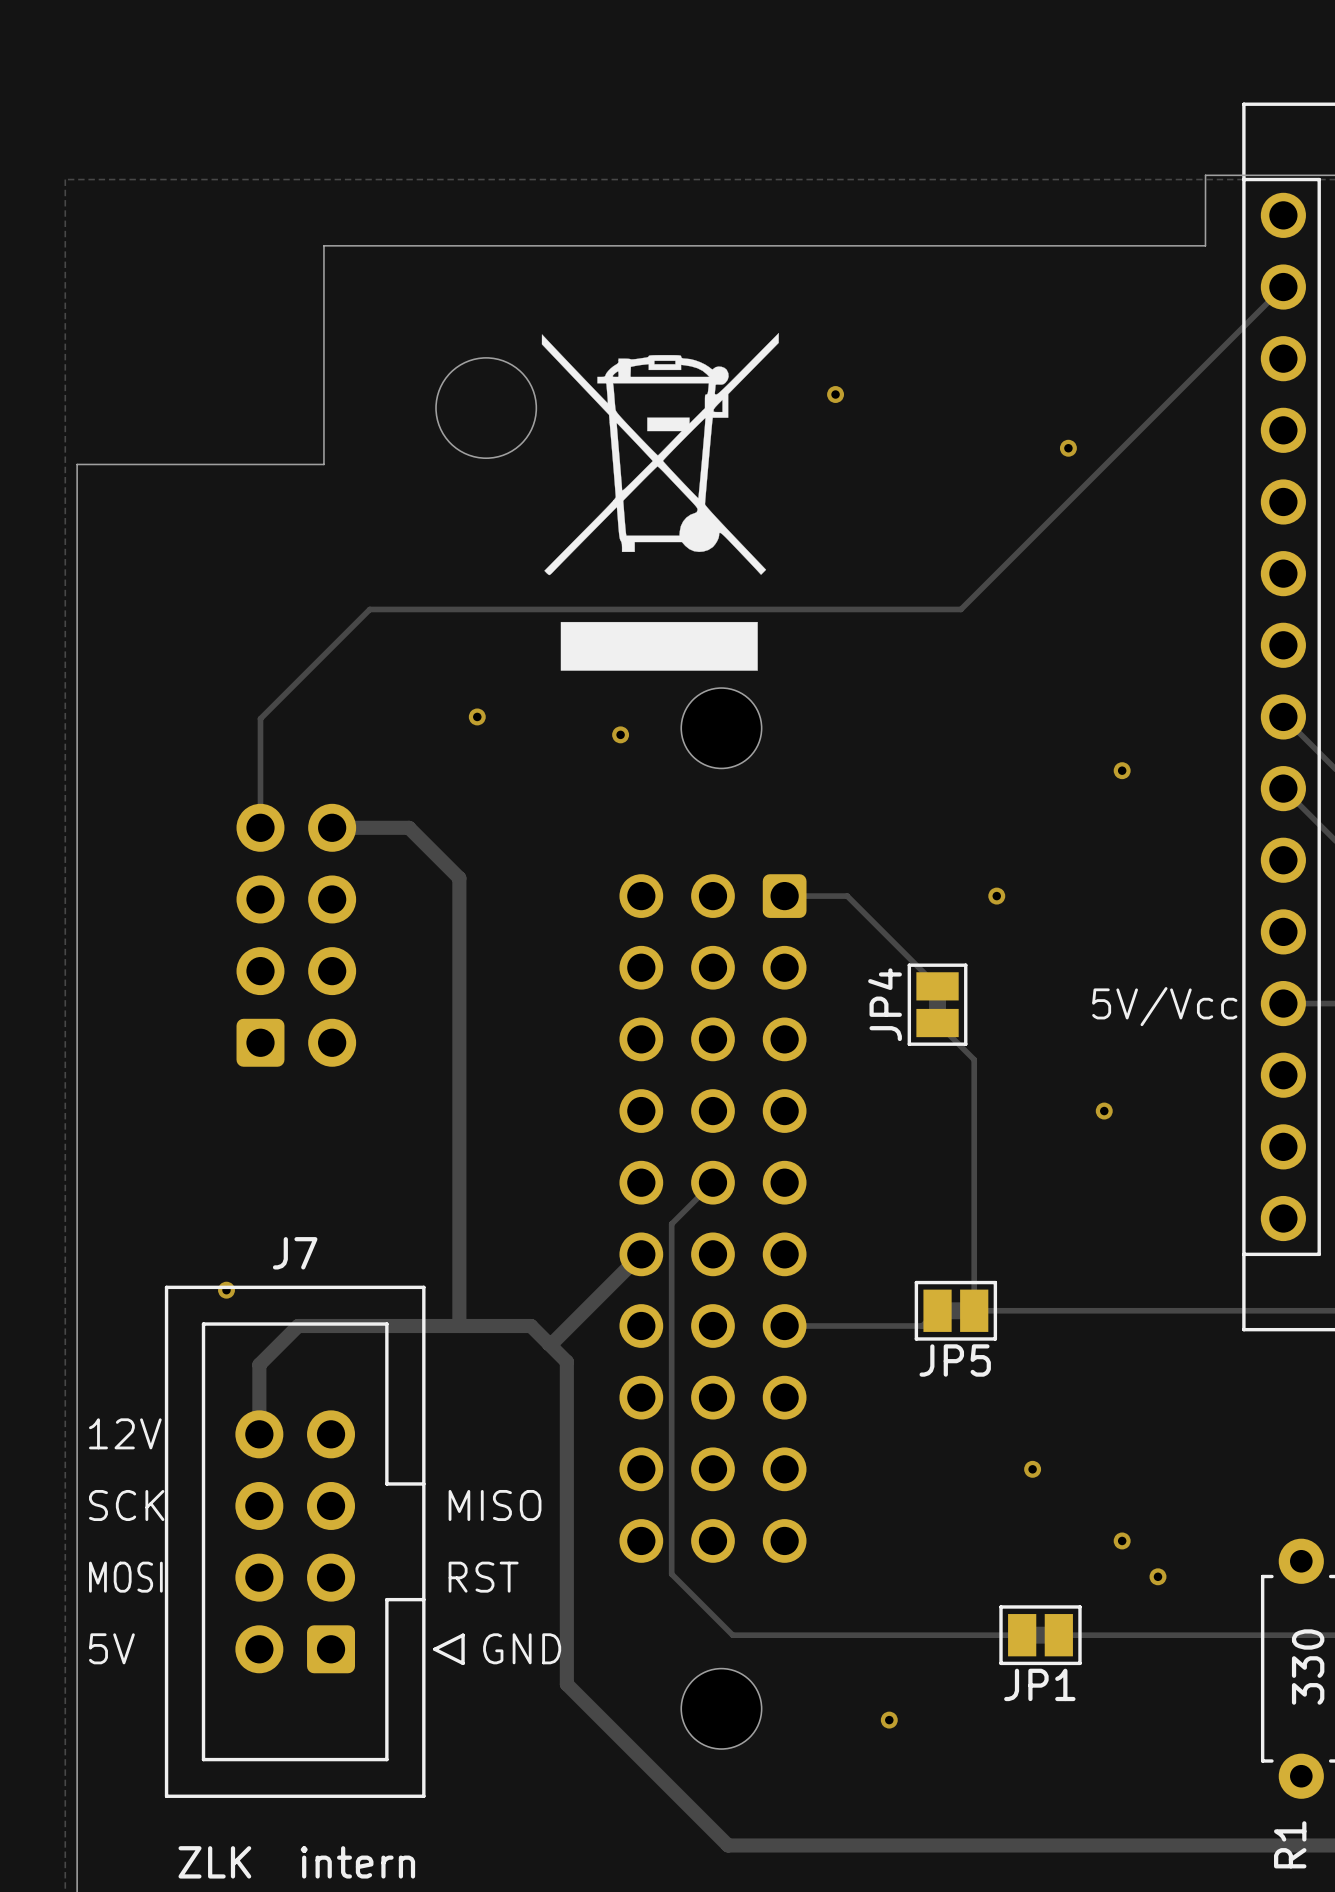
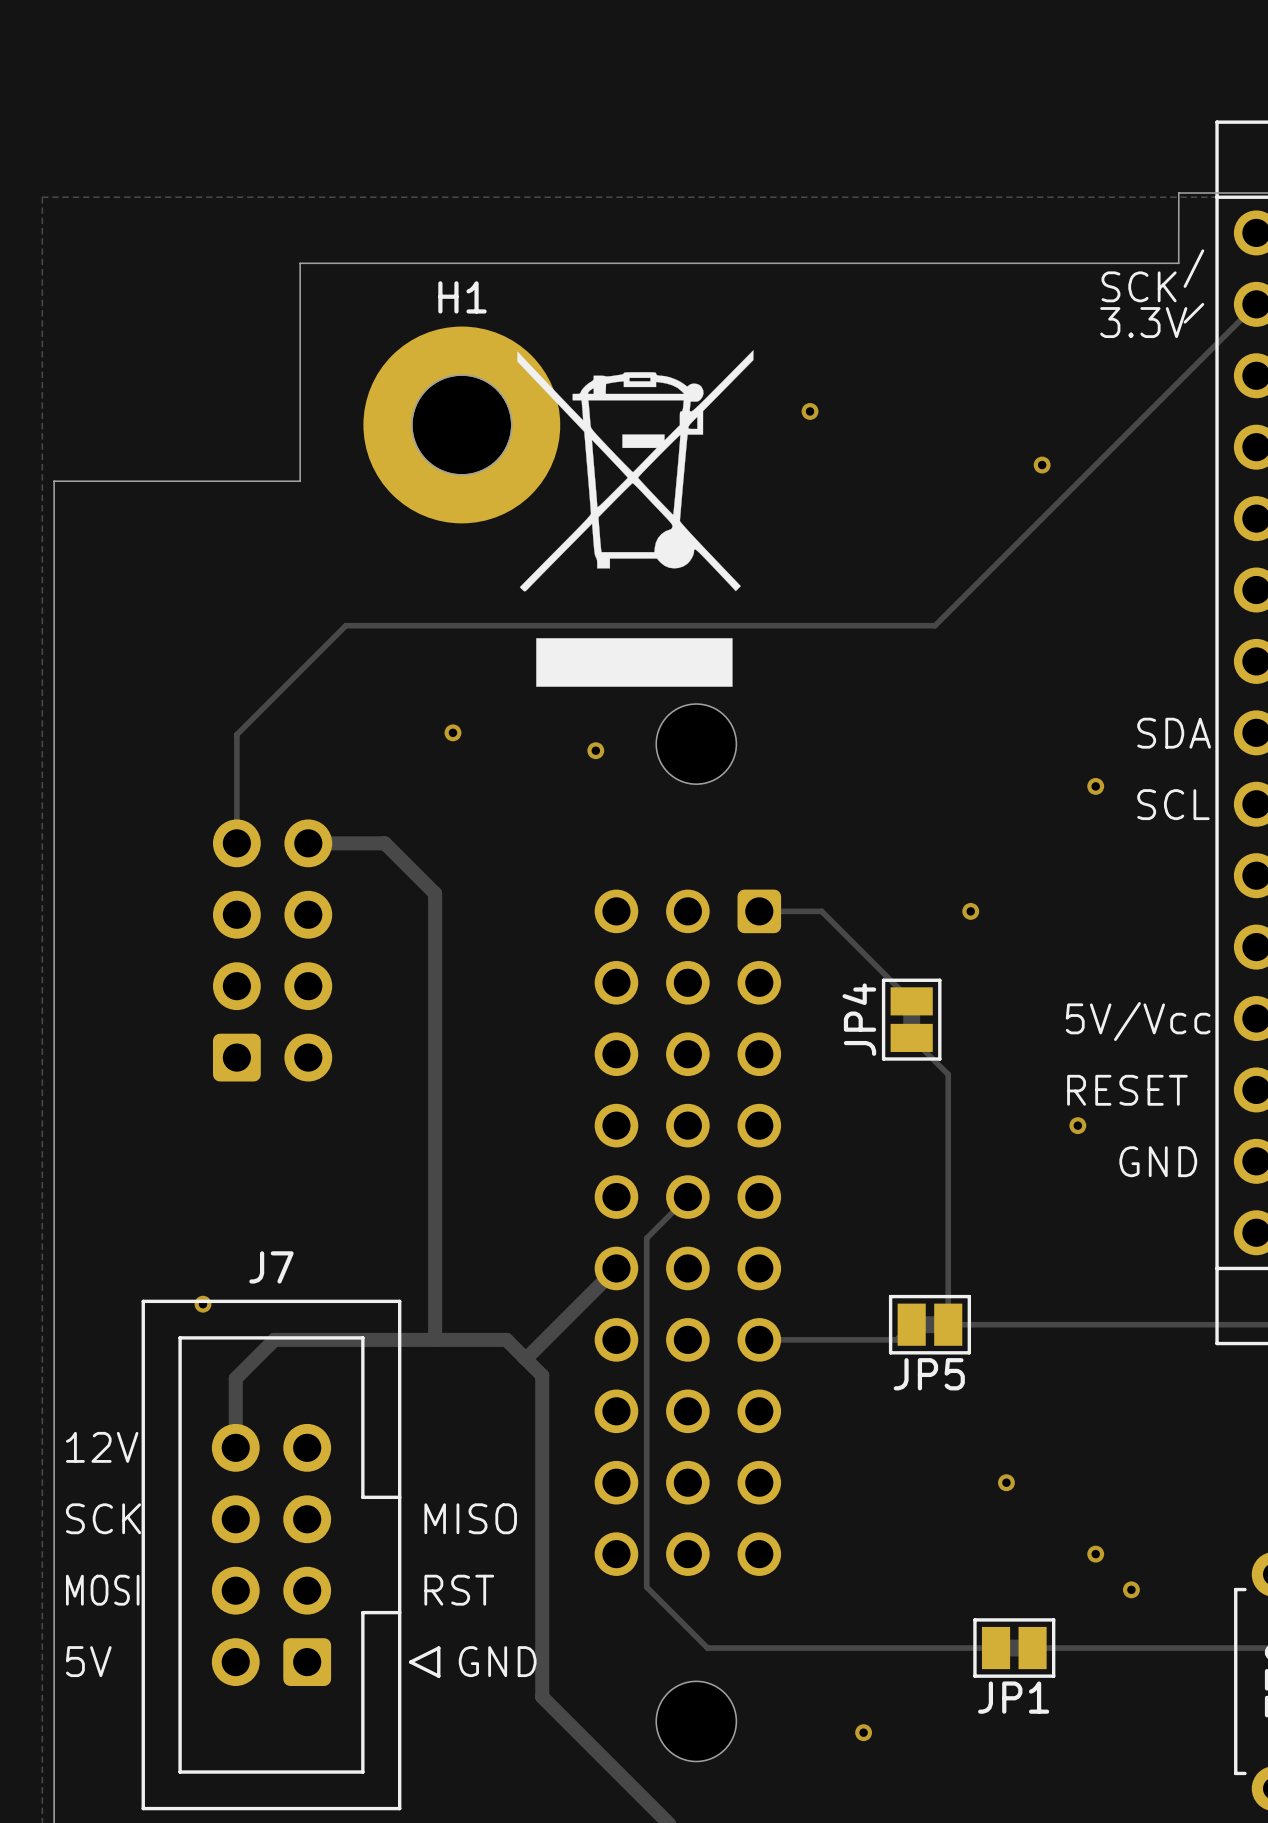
line: none -> (1202, 250) (1184, 286)
text: none -> SCK (1139, 286)
line: none -> (1202, 304) (1184, 322)
text: none -> 3.3V (1143, 322)
H1: none -> (461, 424)
text: none -> SDA (1174, 733)
text: none -> SCL (1173, 804)
text: none -> RESET (1127, 1090)
text: none -> GND (1158, 1161)

